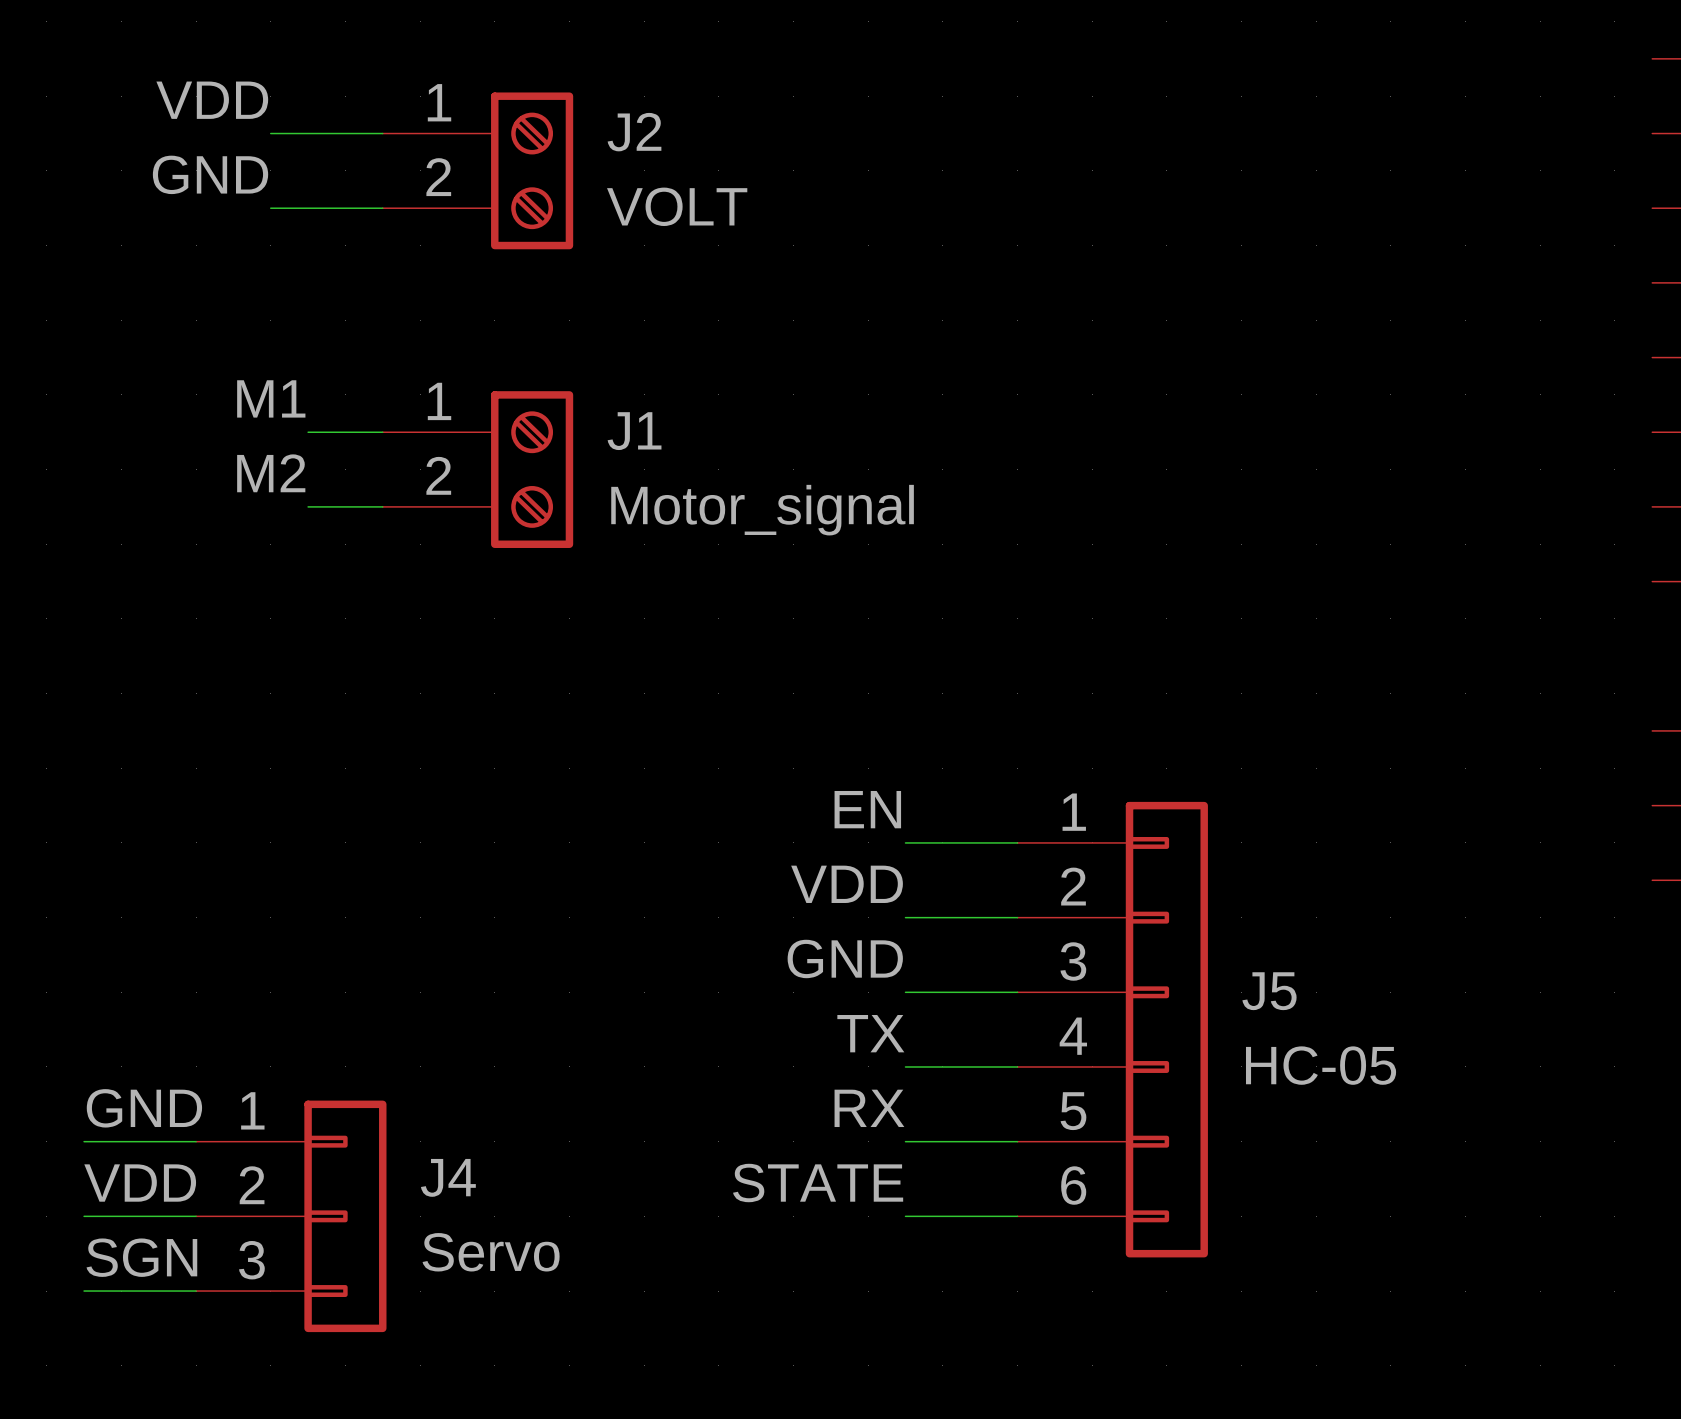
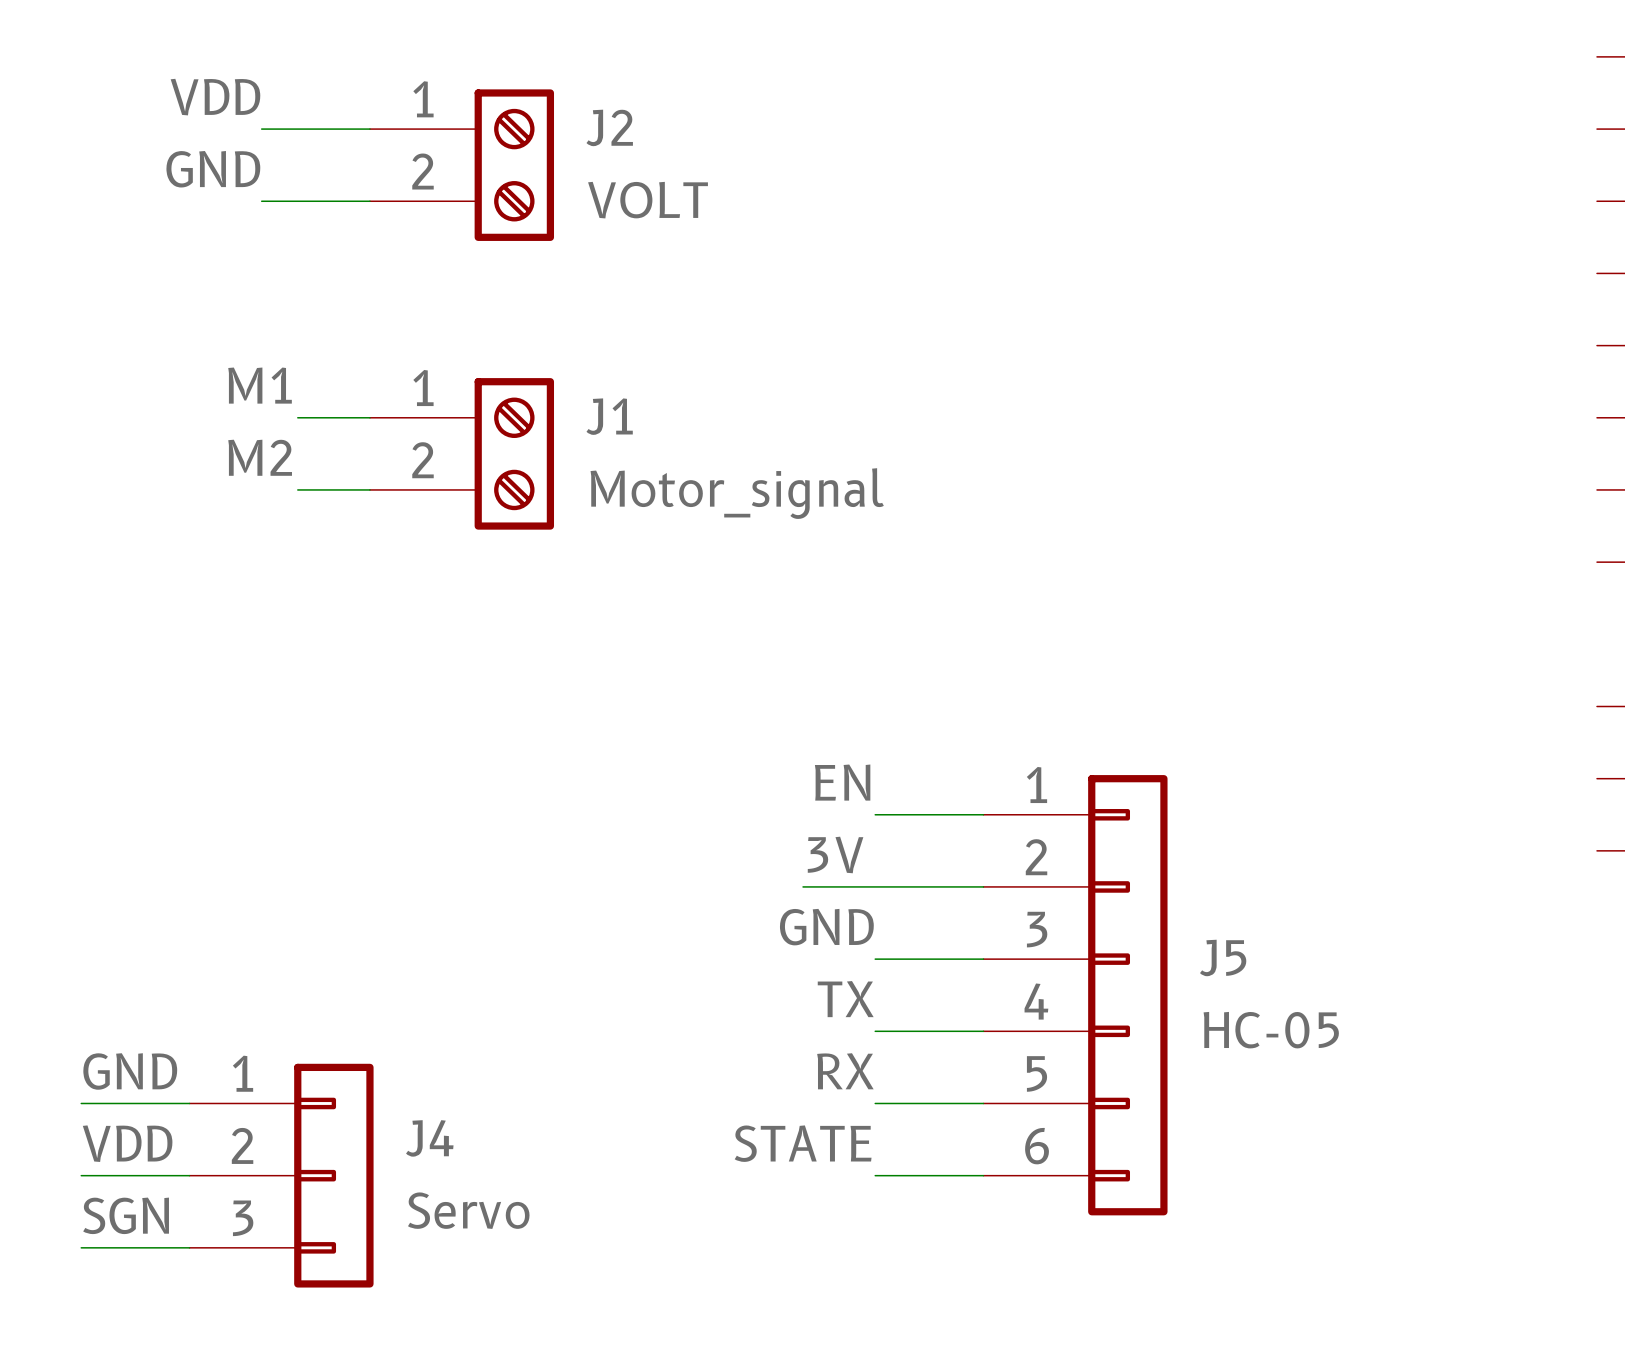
label: VDD (847, 884) -> none
label: none -> 3V (835, 854)
wire: none -> (803, 886) (875, 886)

